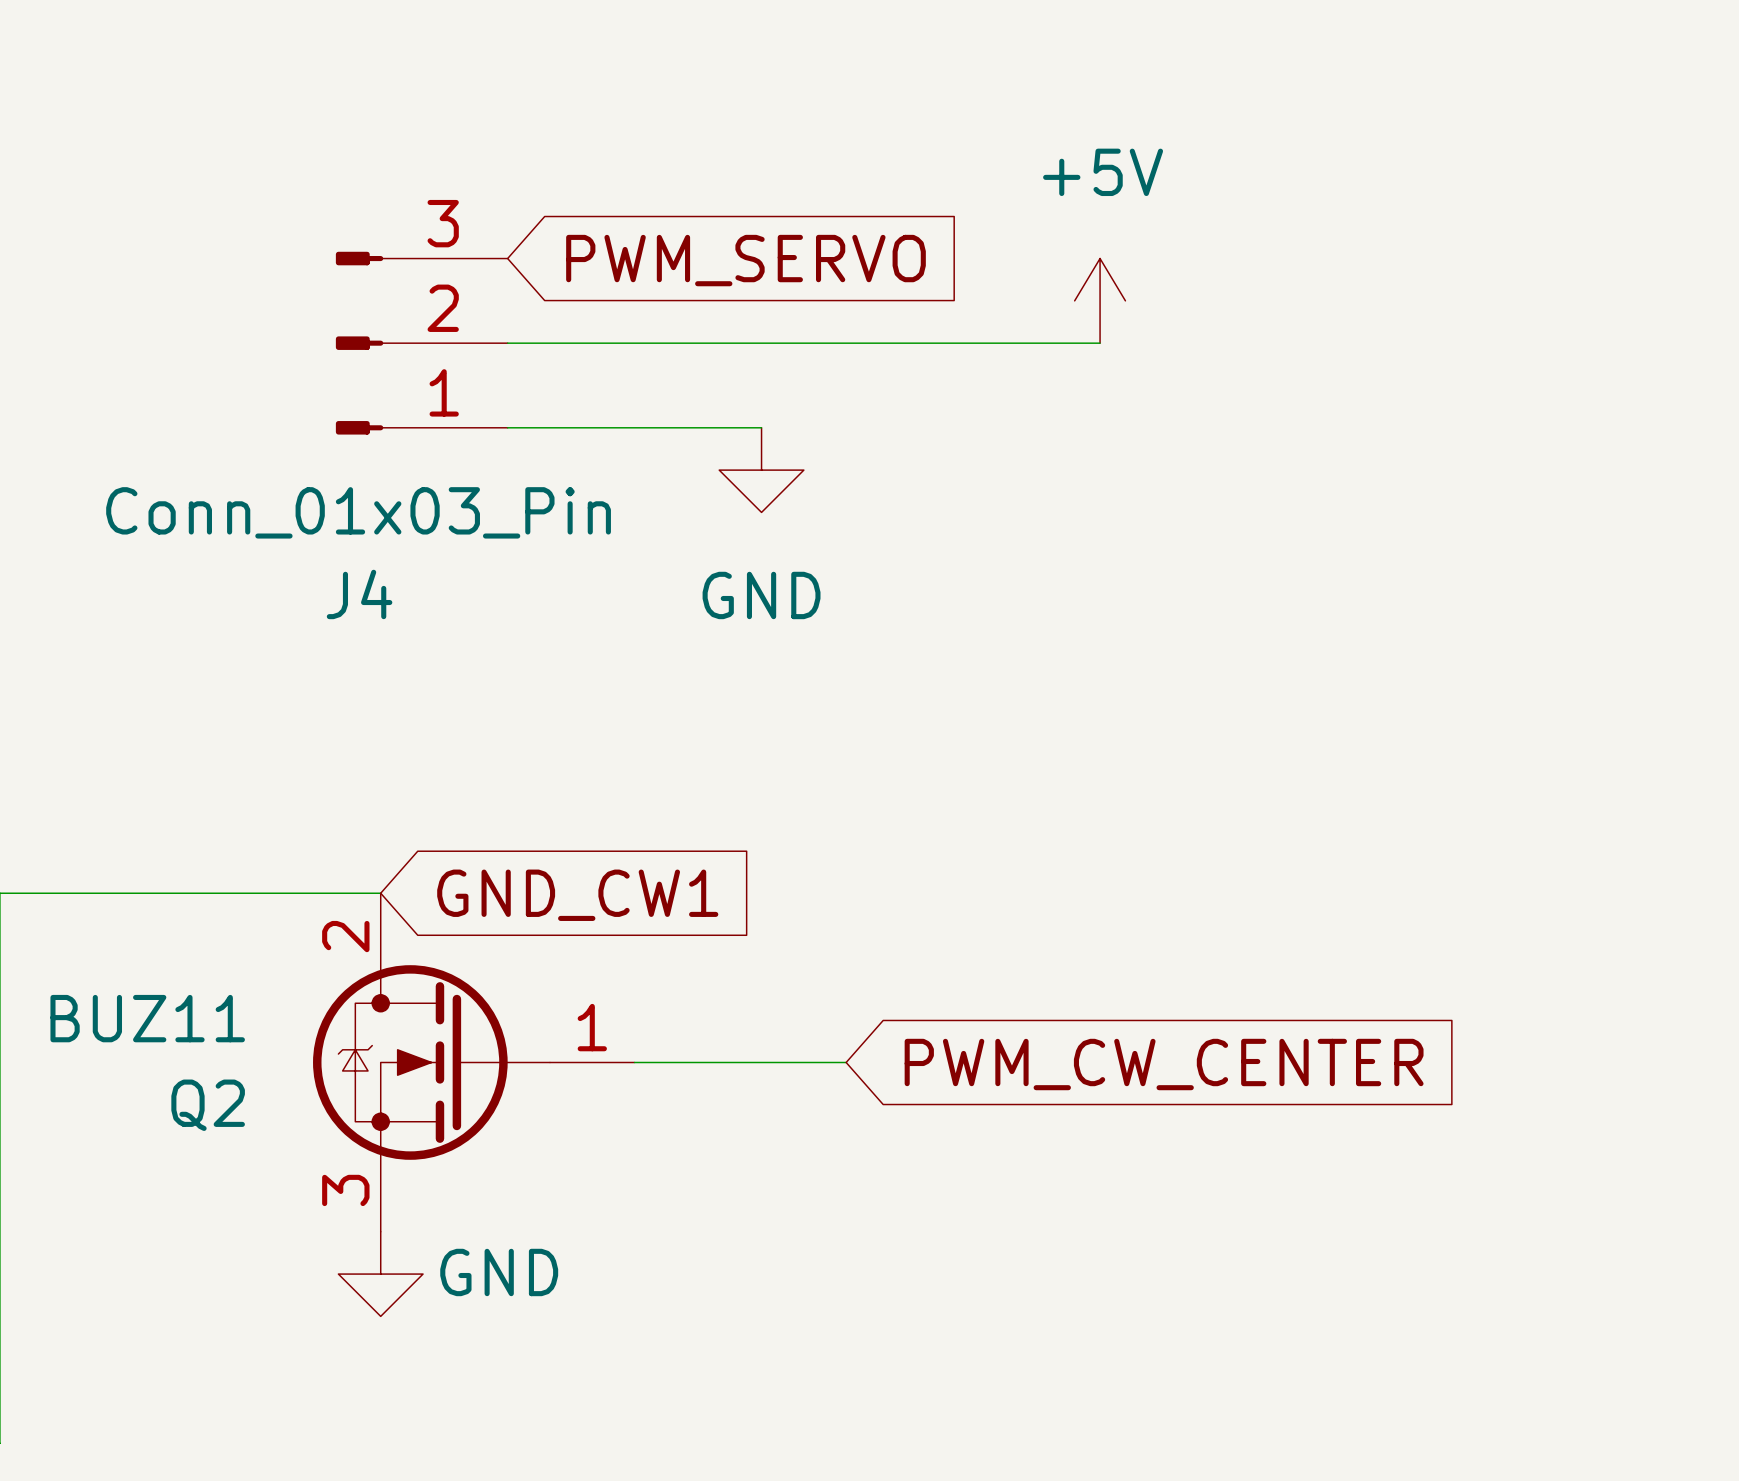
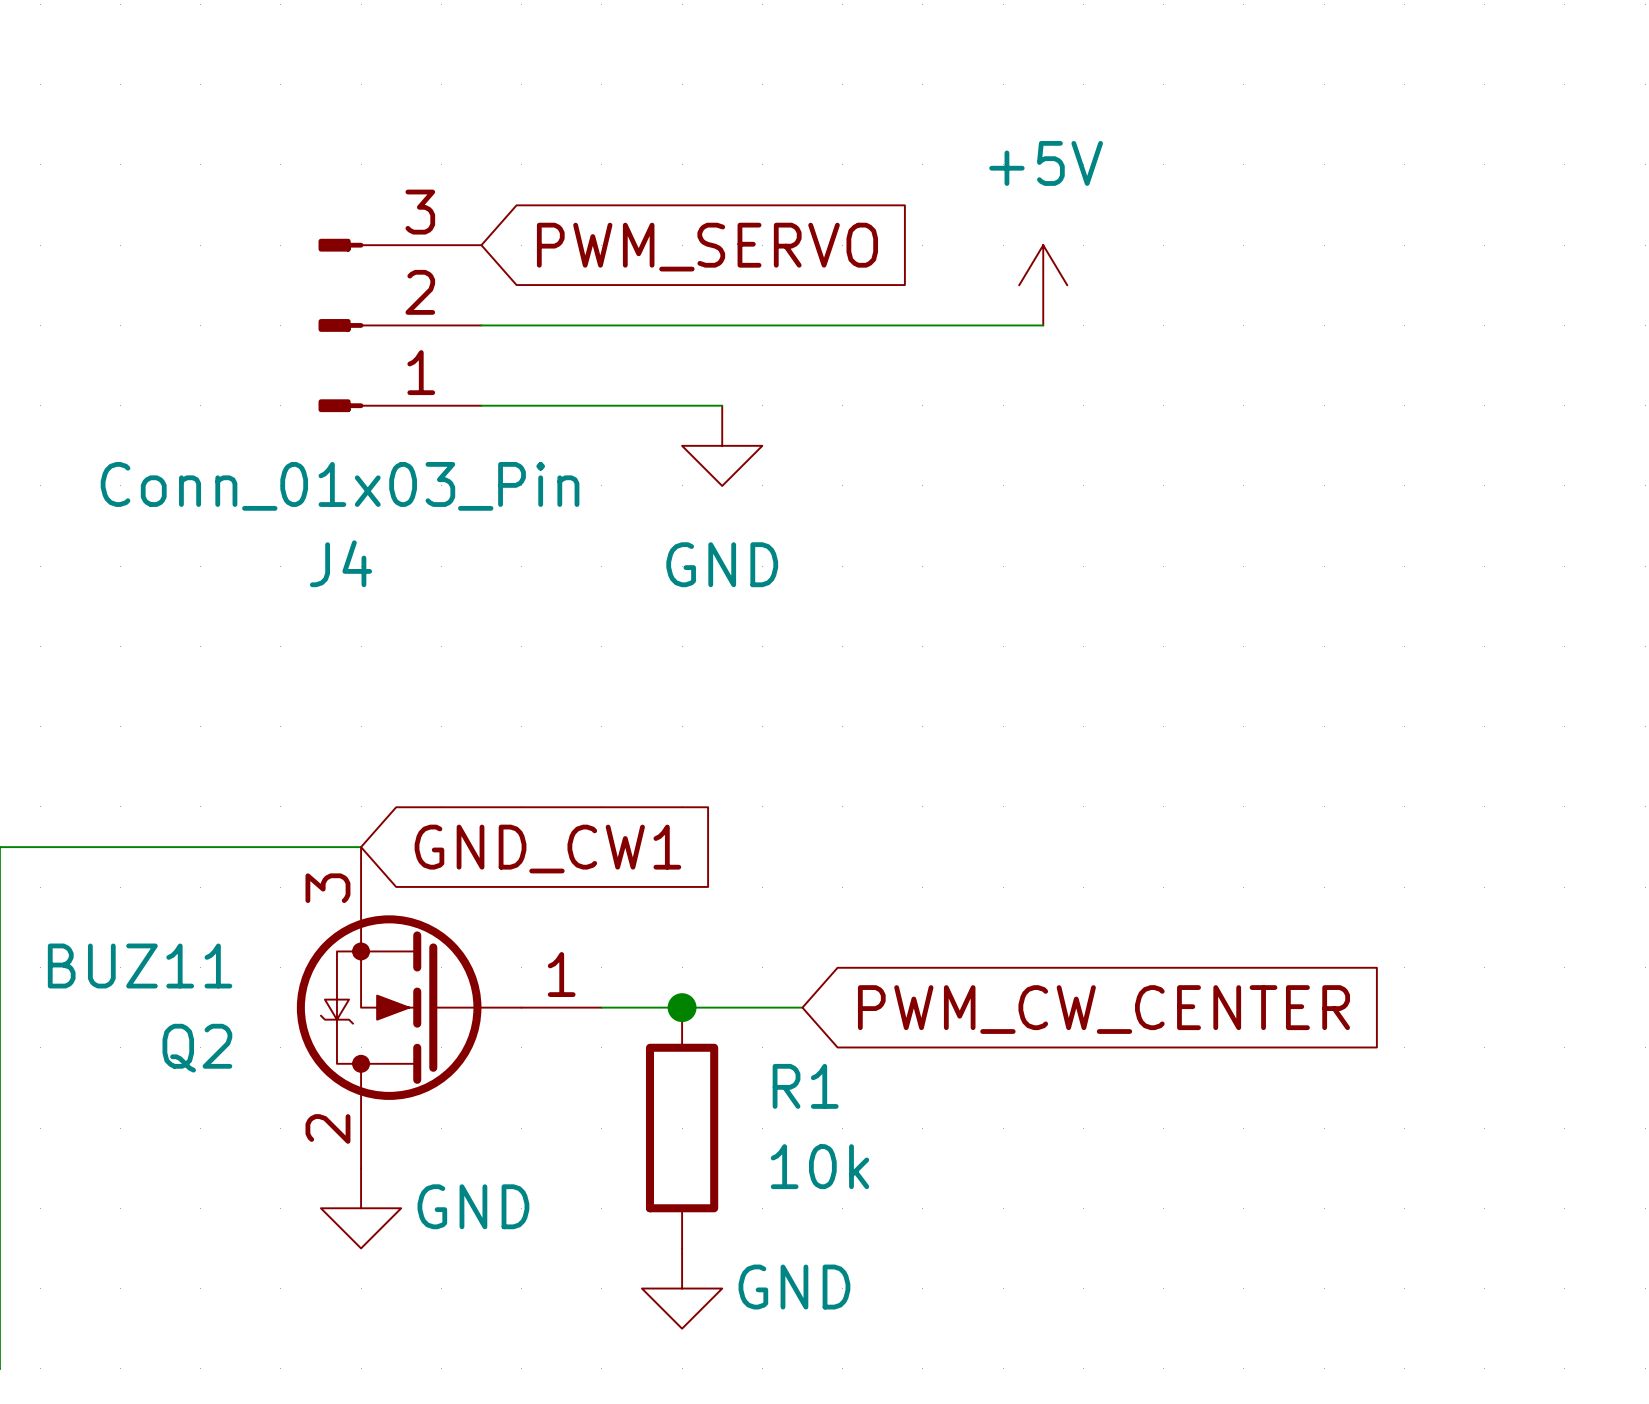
Q2 flip: as is (431, 1062) -> up-down (409, 1007)
junction: none -> (682, 1007)
R1: none -> 10k (682, 1128)
power symbol: none -> GND (682, 1288)

